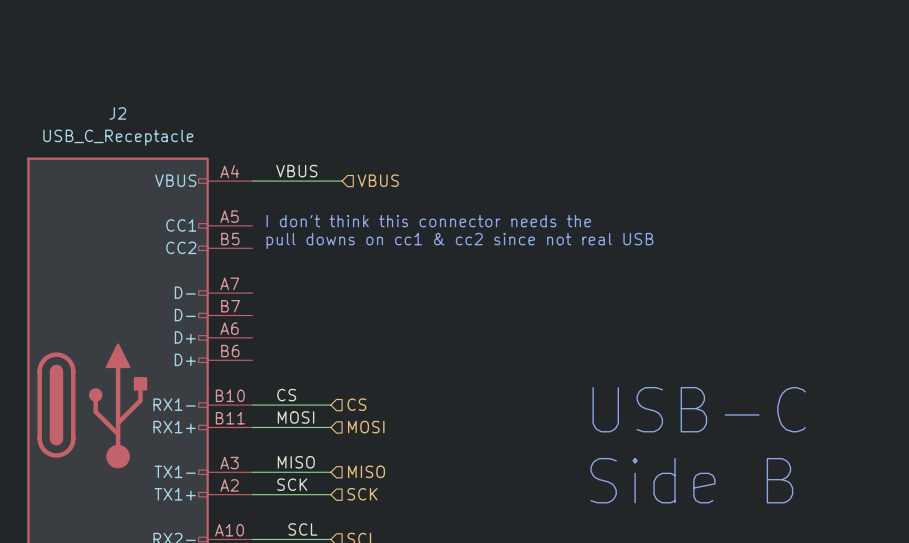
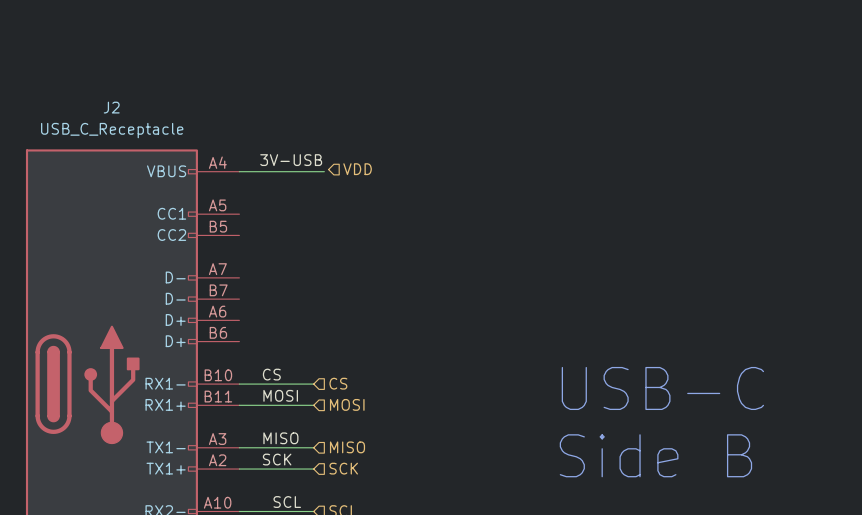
label: VBUS (296, 171) -> 3V-USB (291, 160)
hierarchical label: VBUS (378, 180) -> VDD (357, 169)
text: I don't think this connector needs the (428, 221) -> none
text: pull downs on cc1 & cc2 since not real USB (460, 240) -> none

